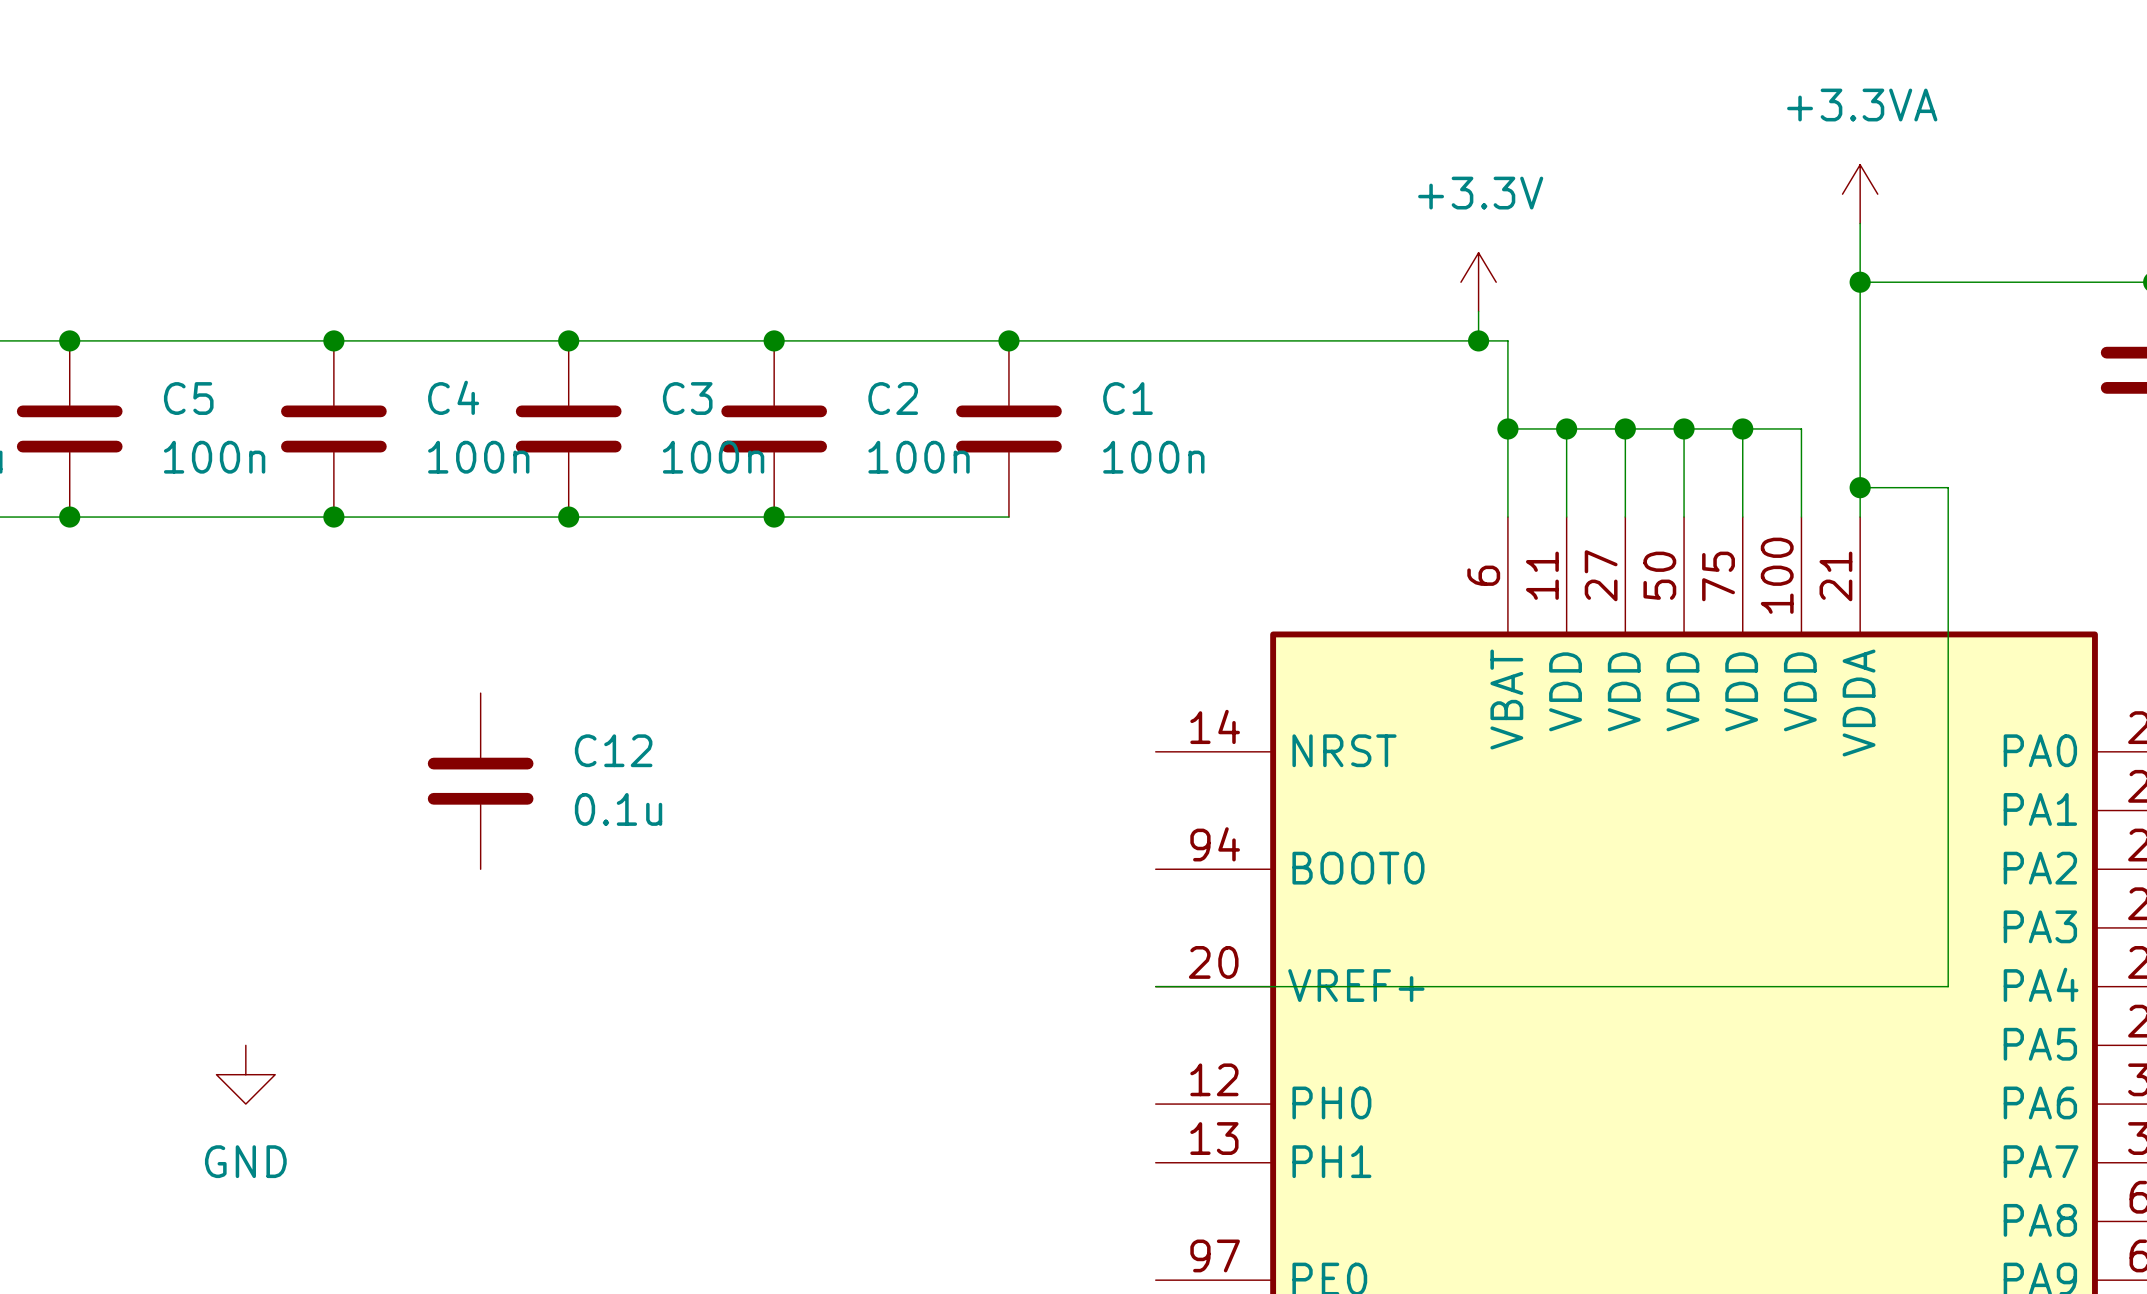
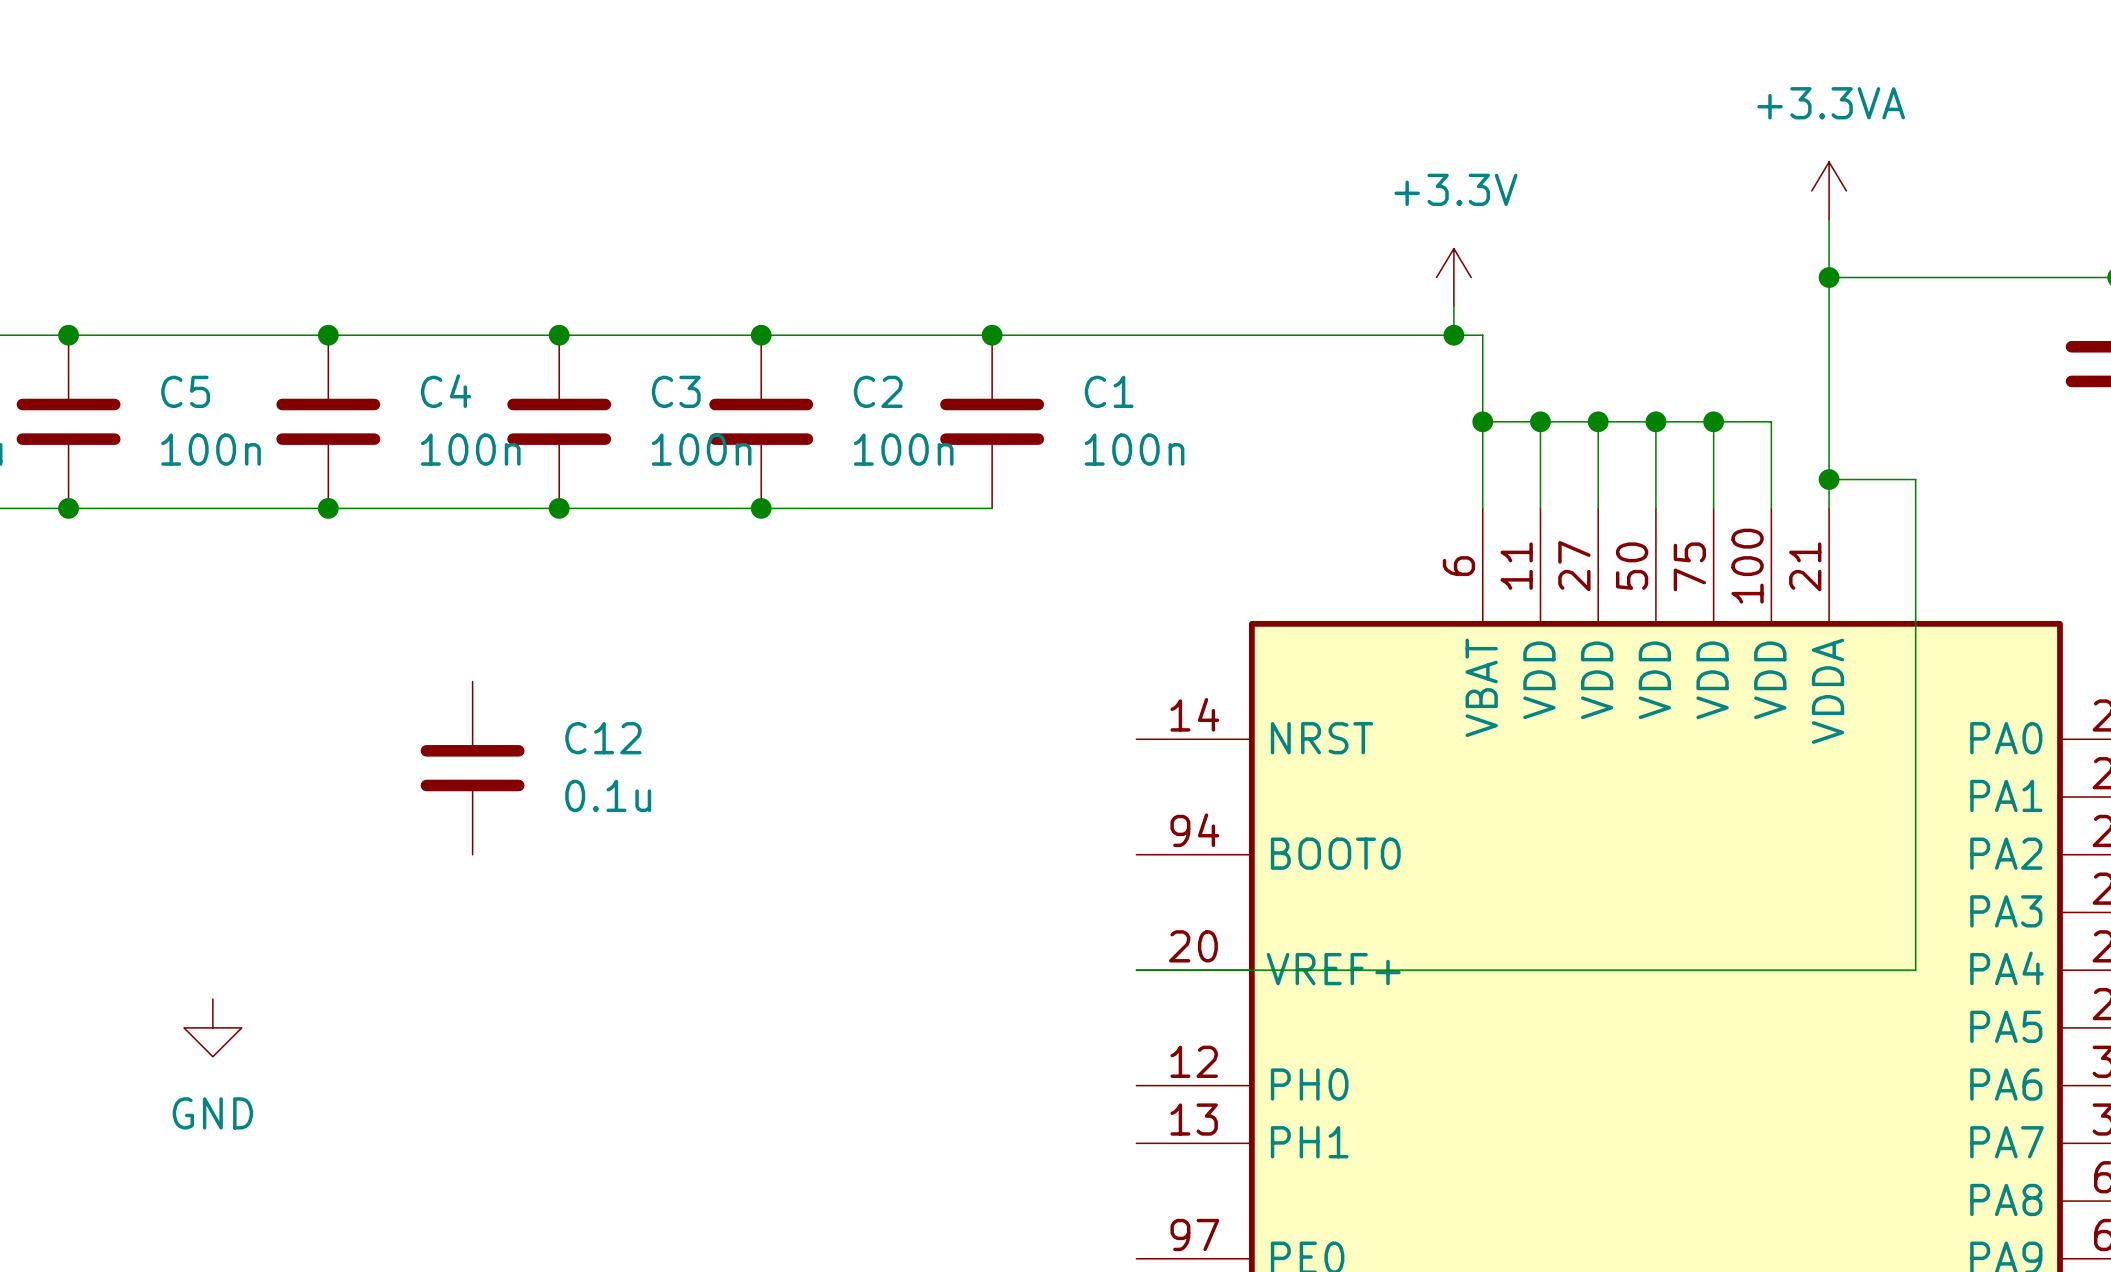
power symbol position: GND (245, 1074) -> GND (212, 1027)

